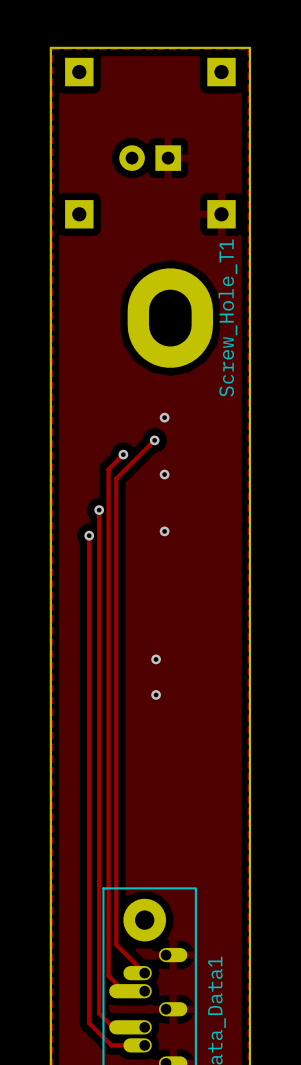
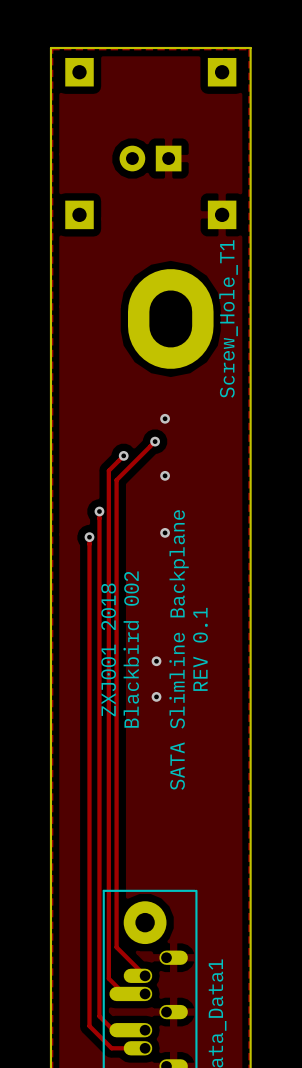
text: none -> Blackbird 002 (131, 649)
text: none -> REV 0.1 (200, 649)
text: none -> ZXJ001 2018 (108, 649)
text: none -> SATA Slimline Backplane (179, 650)

